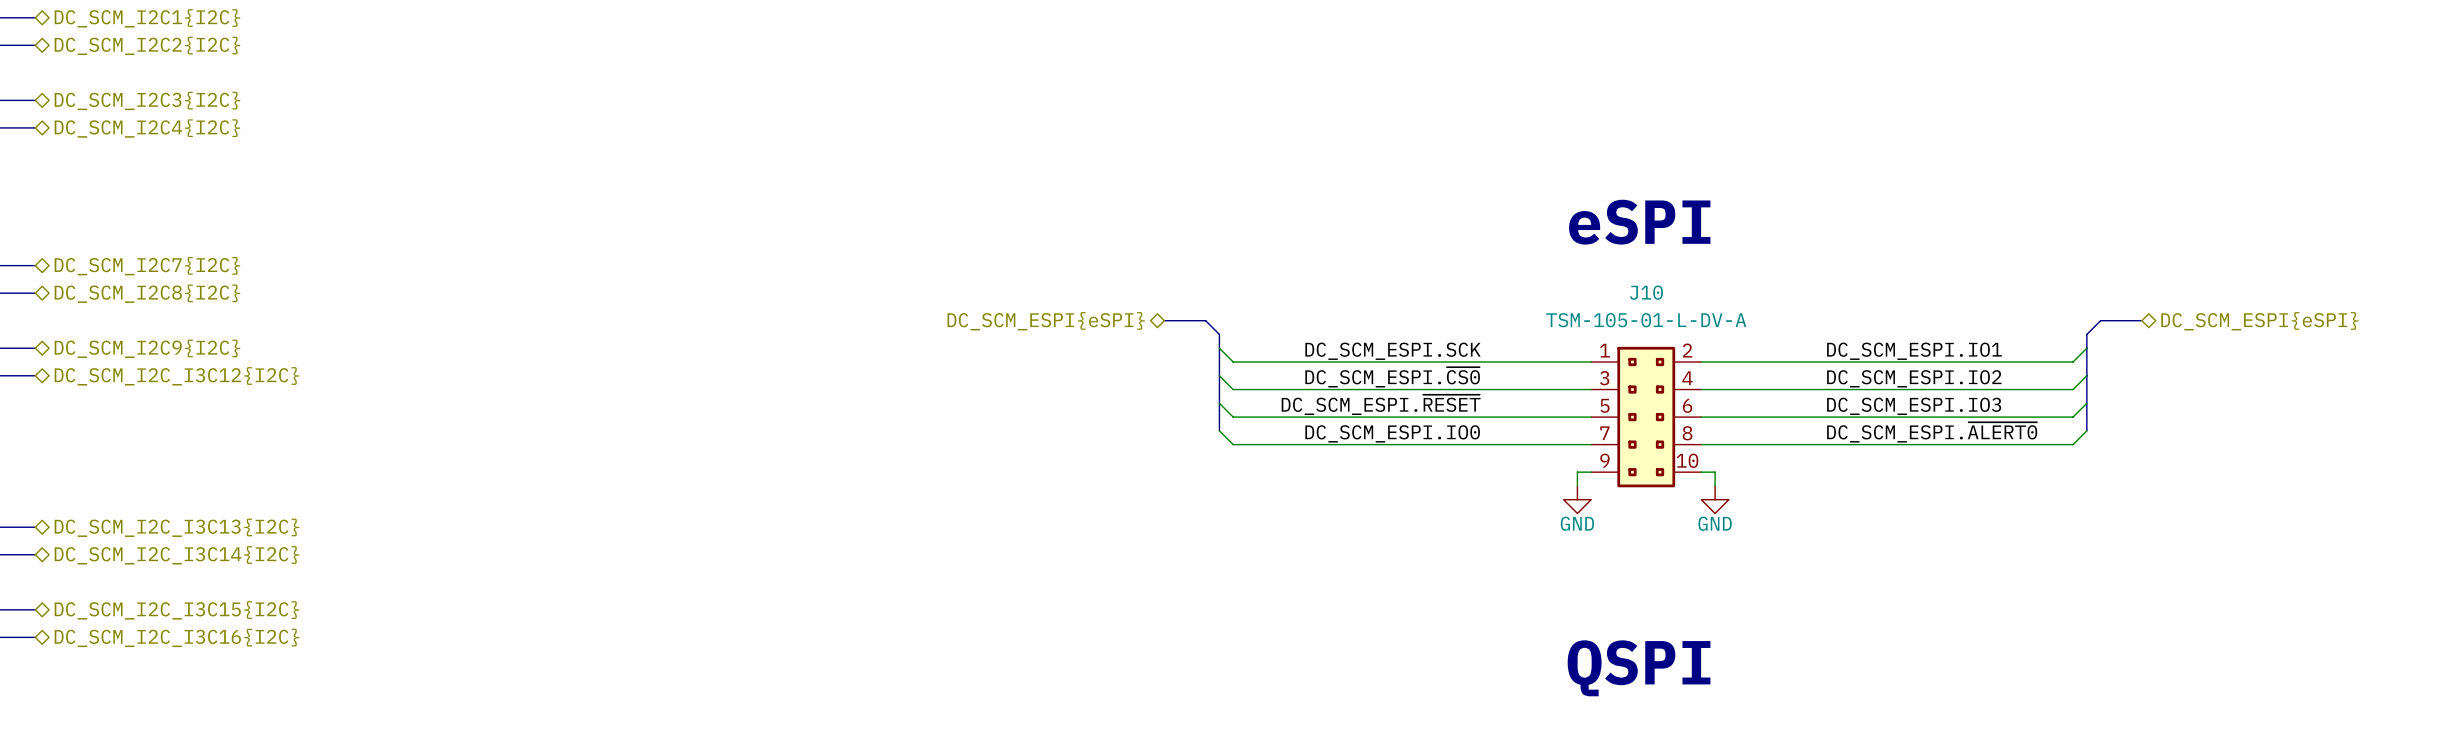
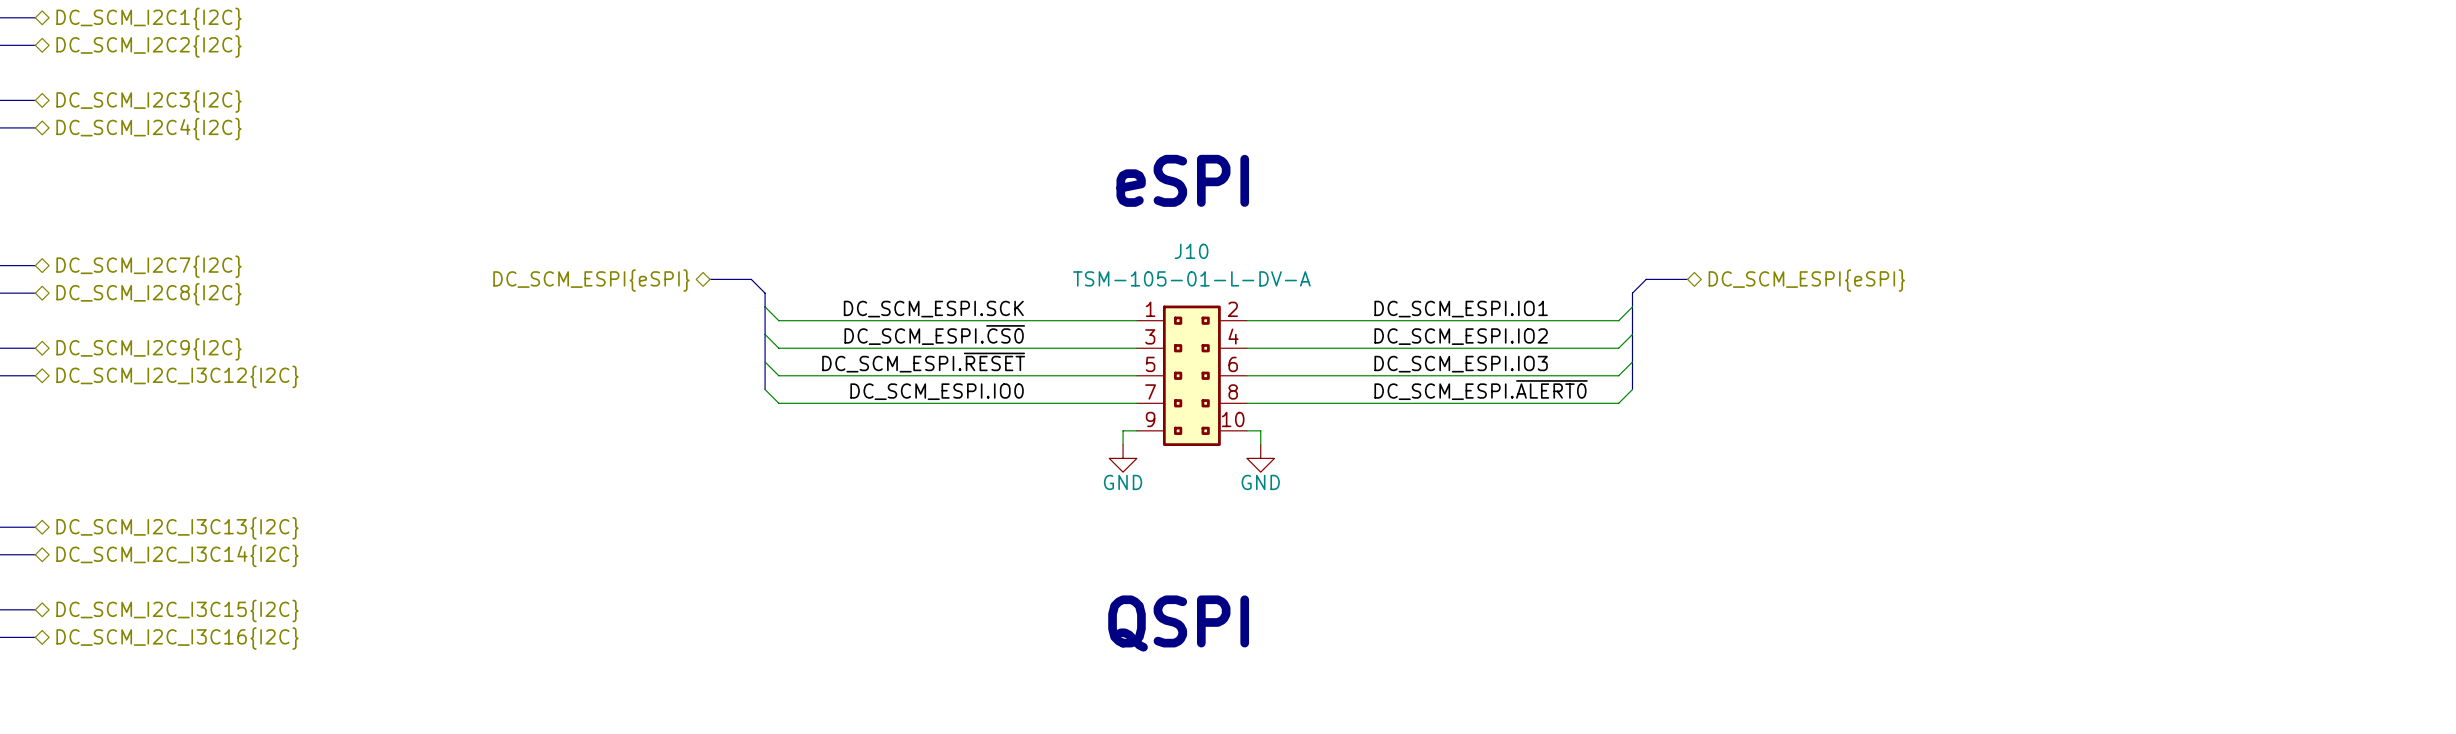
text: none -> eSPI (1182, 180)
text: eSPI (1639, 222) -> none
hierarchical label: none -> DC_SCM_ESPI{eSPI} (591, 280)
bus: none -> (709, 279) (751, 279) (765, 293) (765, 389)
bus: none -> (1687, 279) (1646, 279) (1632, 293) (1632, 389)
hierarchical label: none -> DC_SCM_ESPI{eSPI} (1806, 280)
wire: none -> (765, 306) (778, 320) (1136, 320)
wire: none -> (1632, 306) (1618, 320) (1246, 320)
label: none -> DC_SCM_ESPI.SCK (933, 309)
label: none -> DC_SCM_ESPI.IO1 (1461, 309)
bus: (1164, 320) (1205, 320) (1219, 334) (1219, 430) -> none
bus: (2141, 320) (2100, 320) (2086, 334) (2086, 430) -> none
hierarchical label: DC_SCM_ESPI{eSPI} (1046, 321) -> none
hierarchical label: DC_SCM_ESPI{eSPI} (2259, 321) -> none
wire: none -> (765, 334) (778, 348) (1136, 348)
wire: none -> (1632, 334) (1618, 348) (1246, 348)
label: none -> DC_SCM_ESPI.~{CS0} (934, 335)
label: none -> DC_SCM_ESPI.IO2 (1461, 336)
wire: (1219, 348) (1233, 362) (1591, 362) -> none
wire: (2086, 348) (2073, 362) (1701, 362) -> none
label: DC_SCM_ESPI.SCK (1392, 351) -> none
label: DC_SCM_ESPI.IO1 (1914, 351) -> none
wire: none -> (765, 362) (778, 375) (1136, 375)
wire: none -> (1632, 362) (1618, 375) (1246, 375)
label: none -> DC_SCM_ESPI.~{RESET} (923, 362)
label: none -> DC_SCM_ESPI.IO3 (1461, 364)
wire: (1219, 375) (1233, 389) (1591, 389) -> none
wire: (2086, 375) (2073, 389) (1701, 389) -> none
label: DC_SCM_ESPI.~{CS0} (1392, 377) -> none
label: DC_SCM_ESPI.IO2 (1914, 378) -> none
wire: none -> (765, 389) (778, 403) (1136, 403)
wire: none -> (1632, 389) (1618, 403) (1246, 403)
label: none -> DC_SCM_ESPI.~{ALERT0} (1481, 390)
label: none -> DC_SCM_ESPI.IO0 (937, 391)
wire: (1219, 403) (1233, 417) (1591, 417) -> none
wire: (2086, 403) (2073, 417) (1701, 417) -> none
label: DC_SCM_ESPI.~{RESET} (1381, 404) -> none
label: DC_SCM_ESPI.IO3 (1914, 406) -> none
J10 position: (1646, 417) -> (1191, 375)
wire: none -> (1136, 430) (1123, 430) (1123, 444)
wire: (1219, 430) (1233, 444) (1591, 444) -> none
wire: none -> (1246, 430) (1260, 430) (1260, 444)
wire: (2086, 430) (2073, 444) (1701, 444) -> none
label: DC_SCM_ESPI.~{ALERT0} (1932, 432) -> none
label: DC_SCM_ESPI.IO0 (1392, 433) -> none
power symbol: none -> GND (1123, 458)
power symbol: none -> GND (1260, 458)
wire: (1591, 472) (1577, 472) (1577, 485) -> none
wire: (1701, 472) (1715, 472) (1715, 485) -> none
power symbol: GND (1577, 499) -> none
power symbol: GND (1715, 499) -> none
text: none -> QSPI (1178, 623)
text: QSPI (1639, 668) -> none

